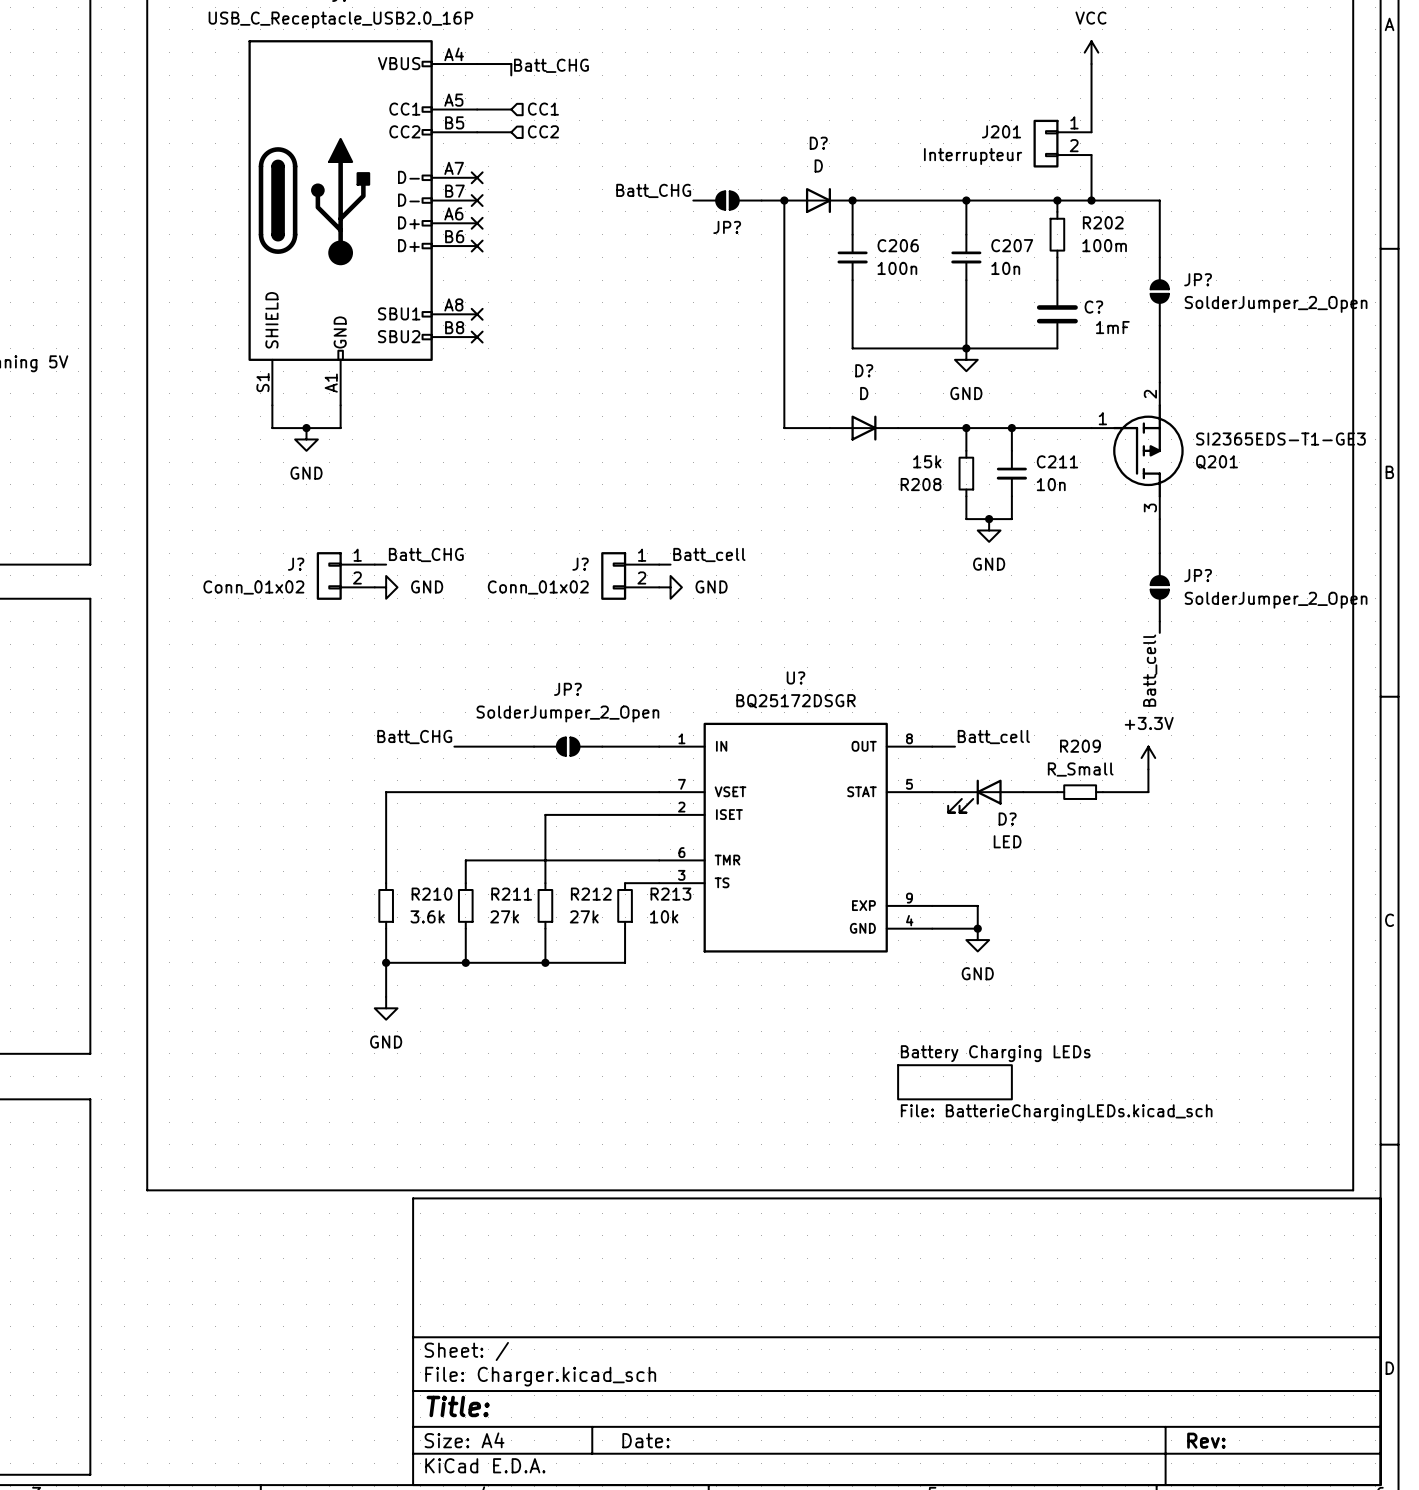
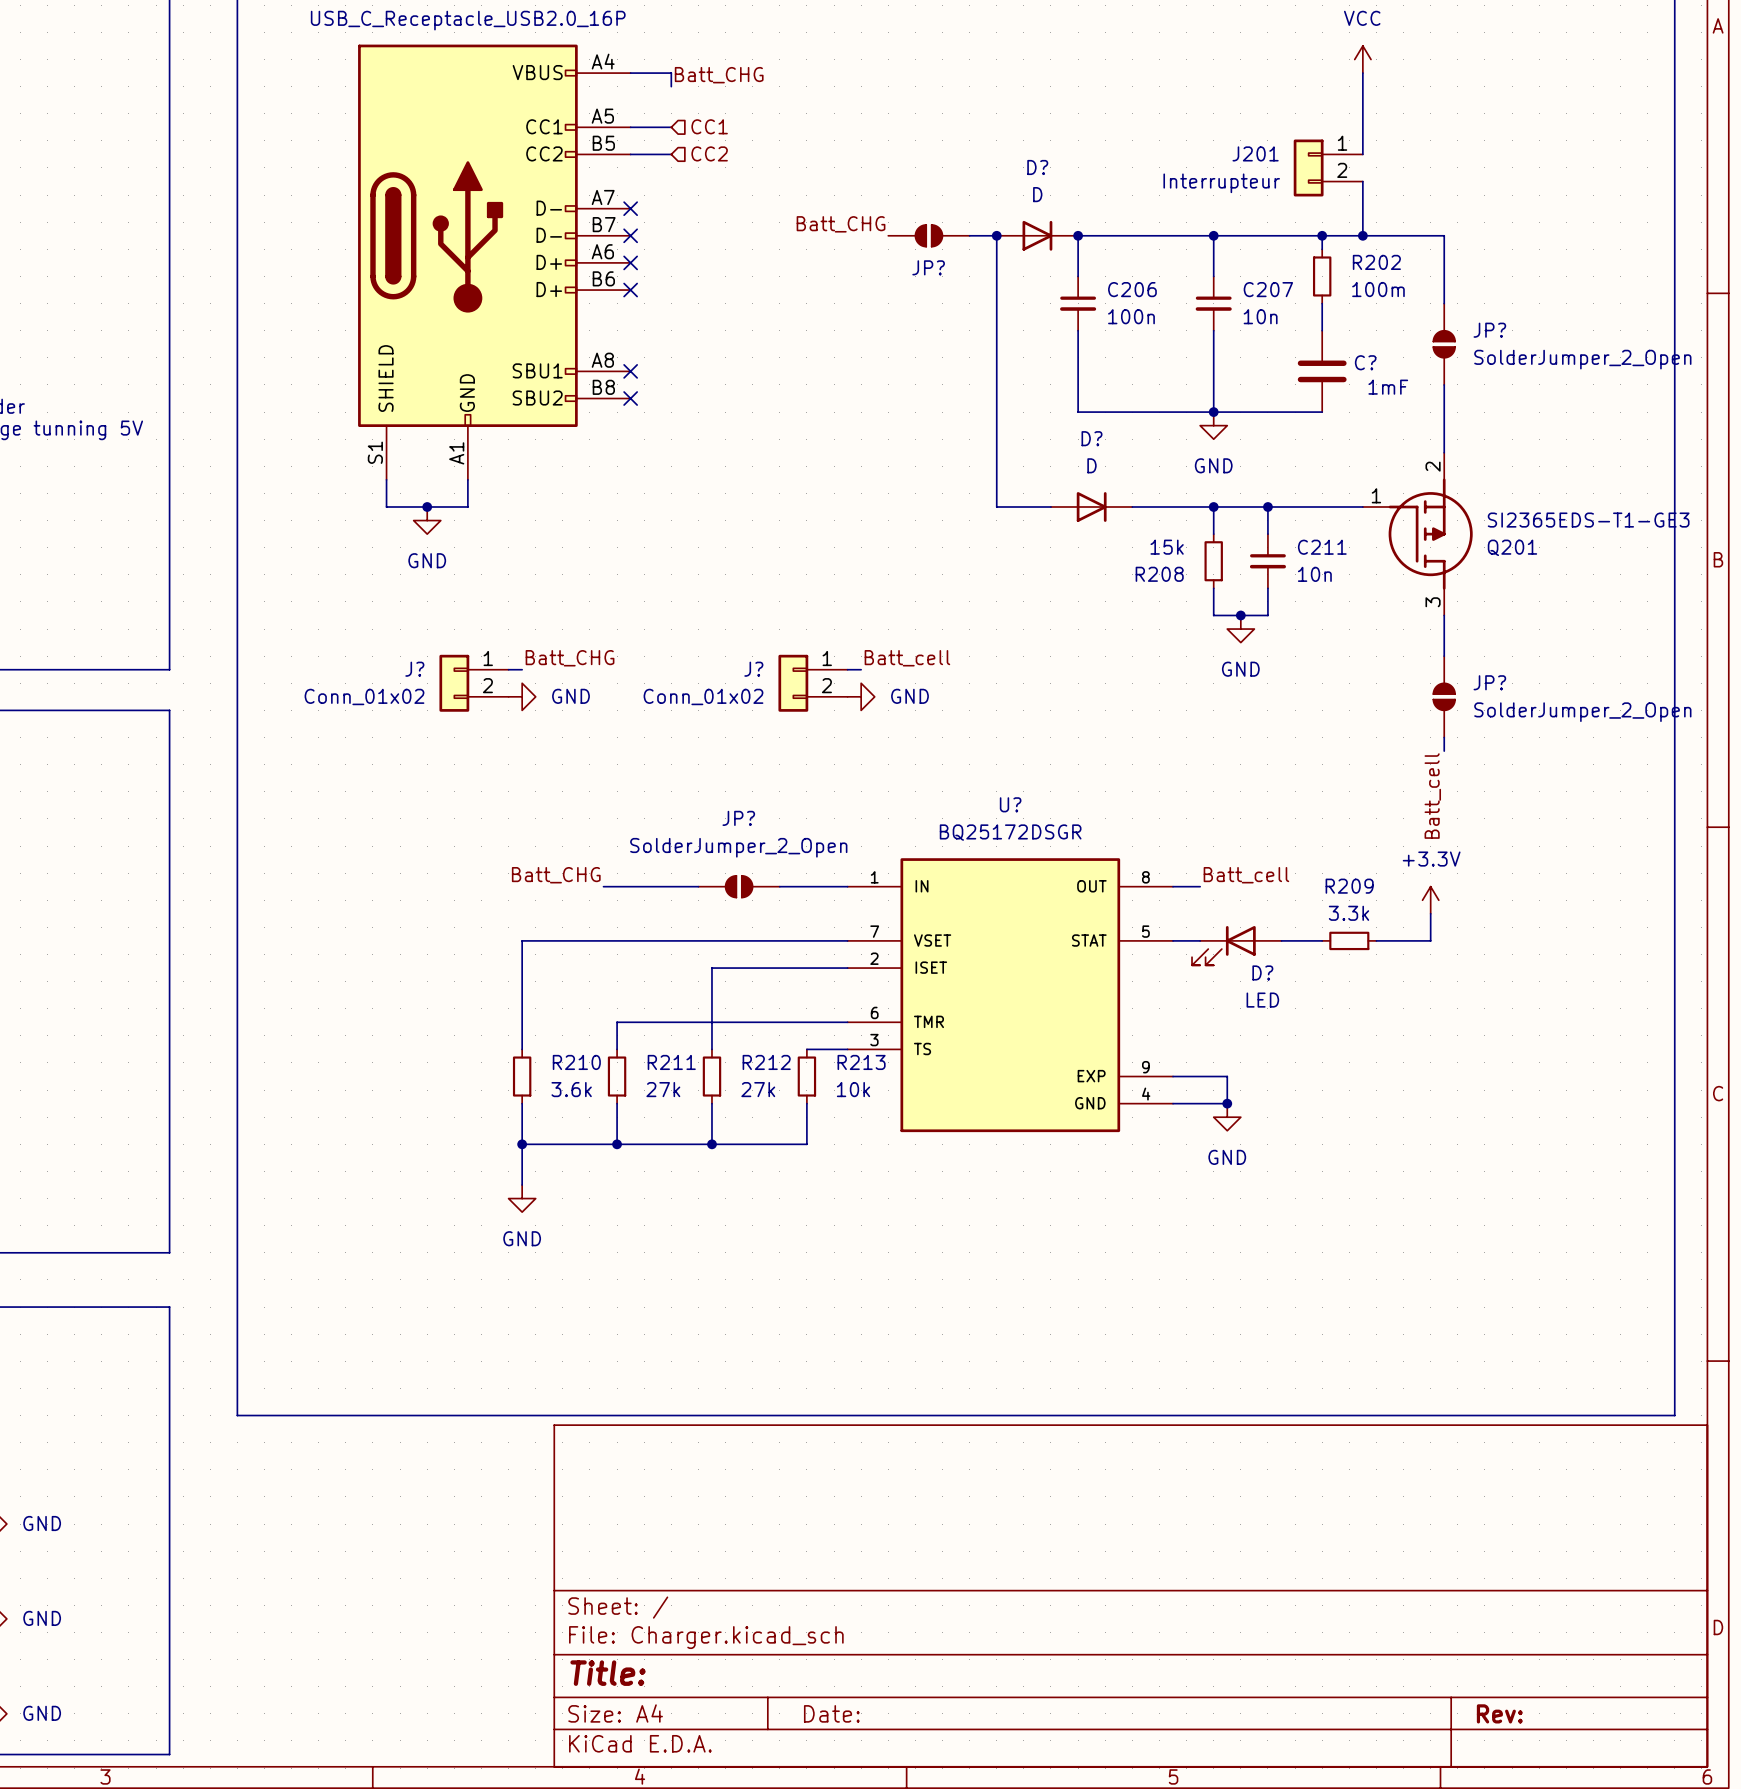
R209 value: R_Small (1080, 769) -> 3.3k (1348, 913)
sheet Battery Charging LEDs: File: BatterieChargingLEDs.kicad_sch (954, 1082) -> none

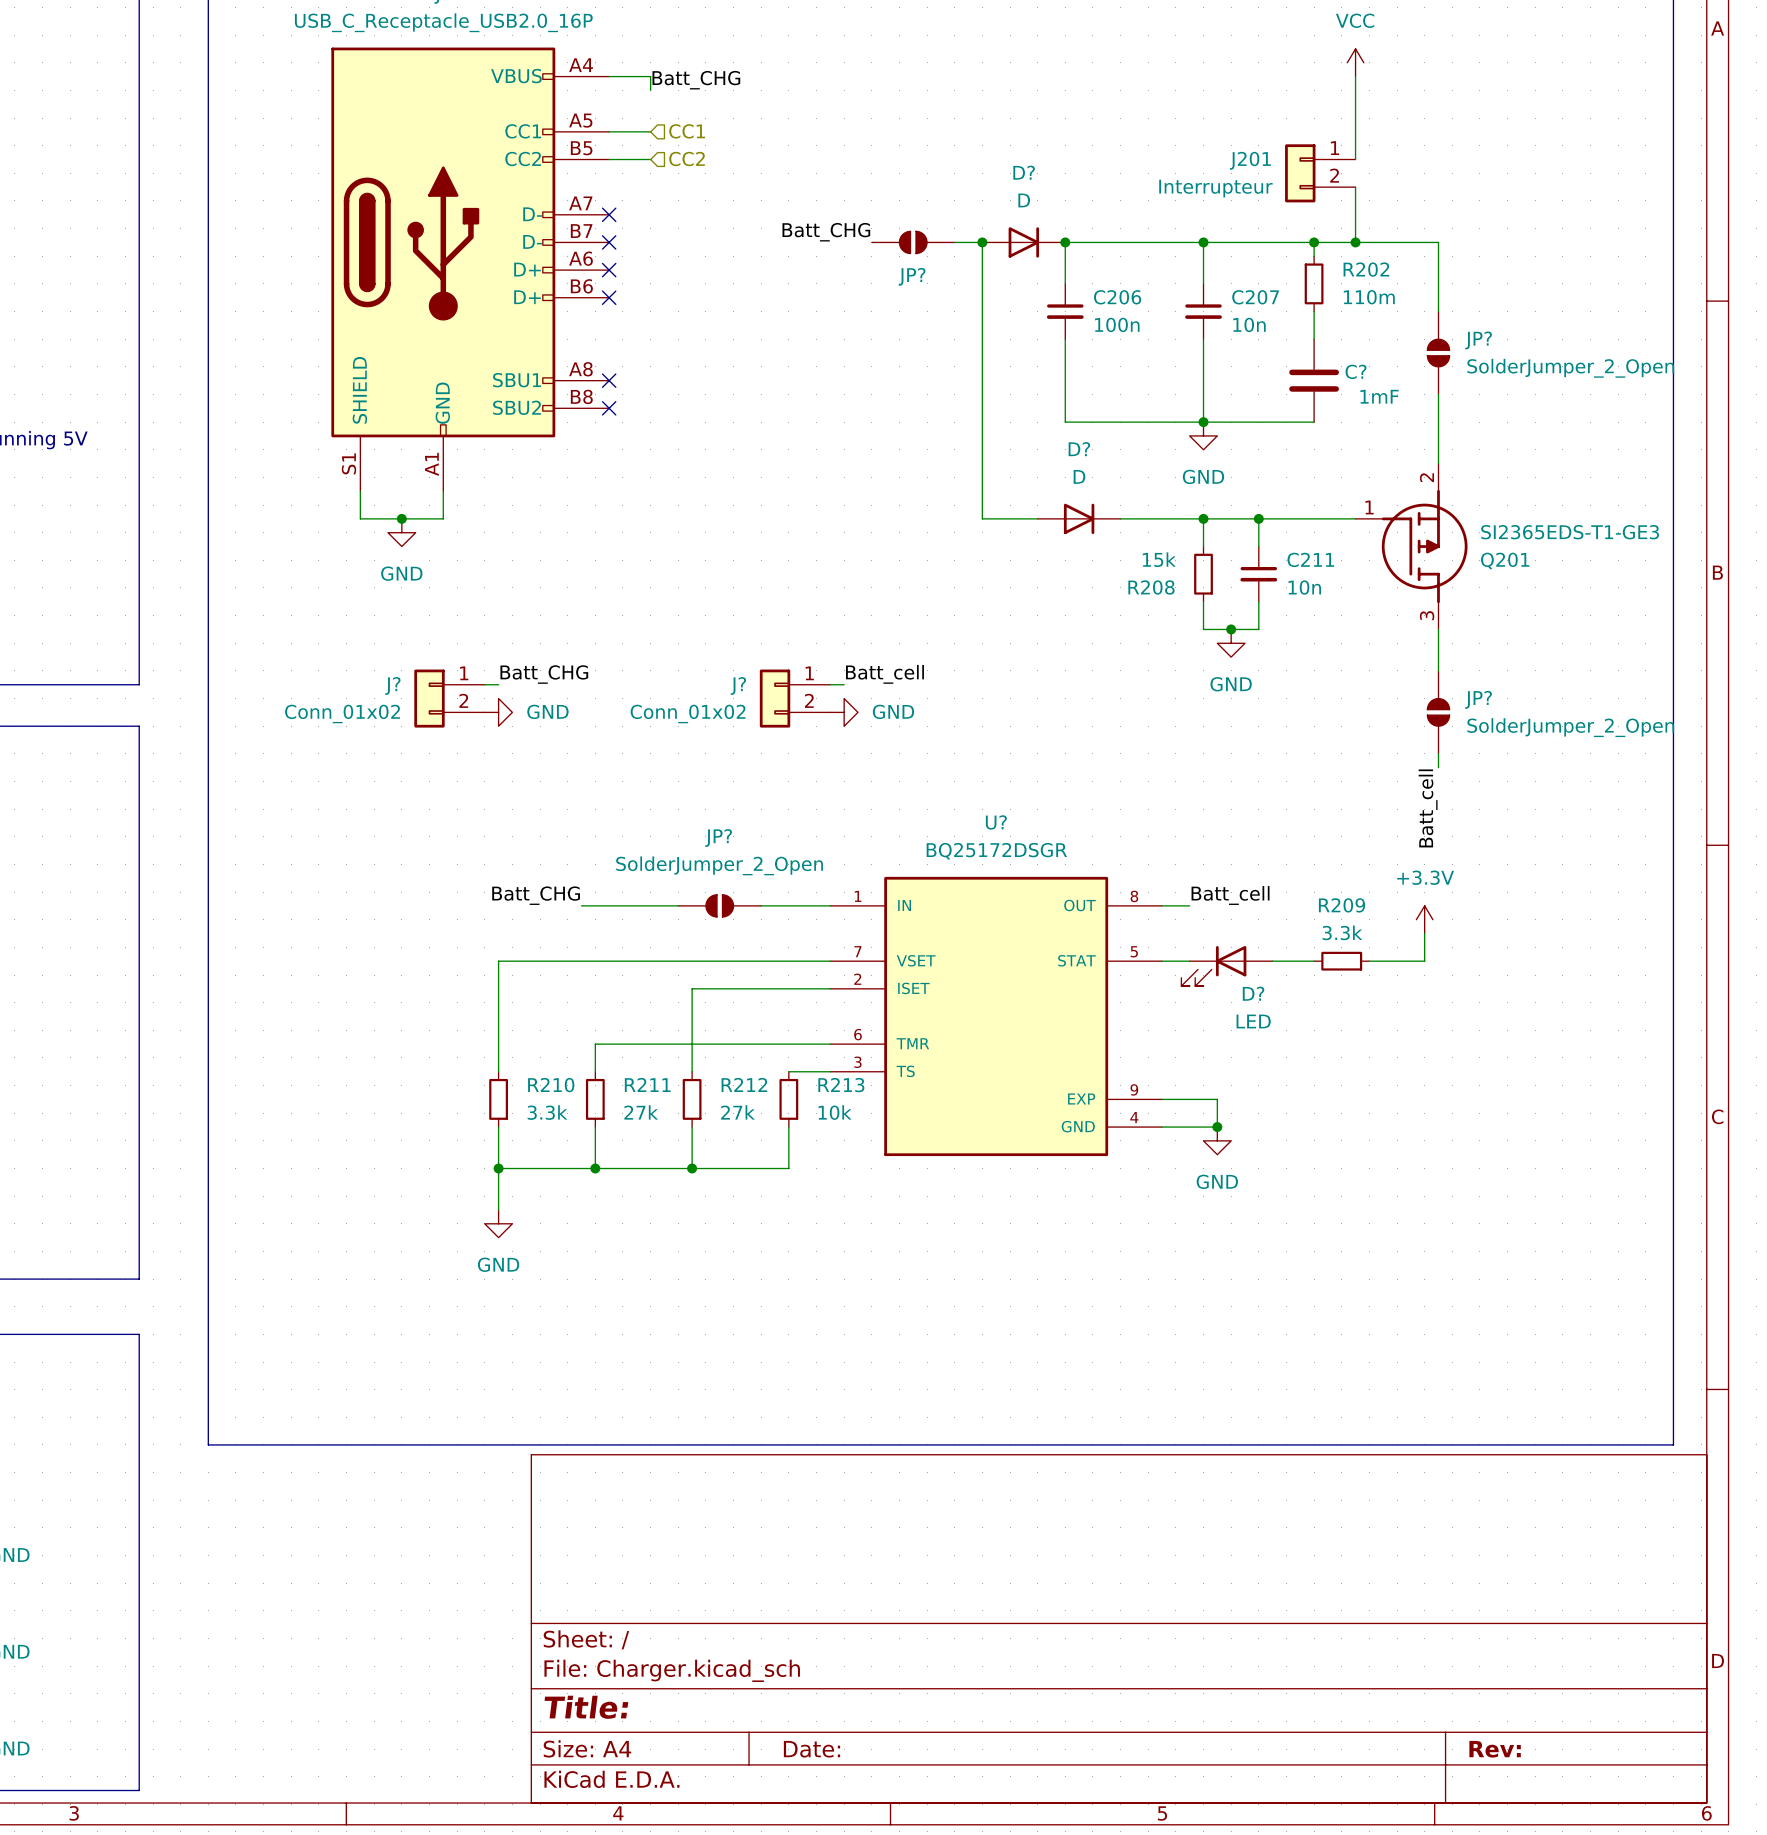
R202 value: 100m (1378, 289) -> 110m (1369, 297)
R210 value: 3.6k (571, 1089) -> 3.3k (547, 1112)

